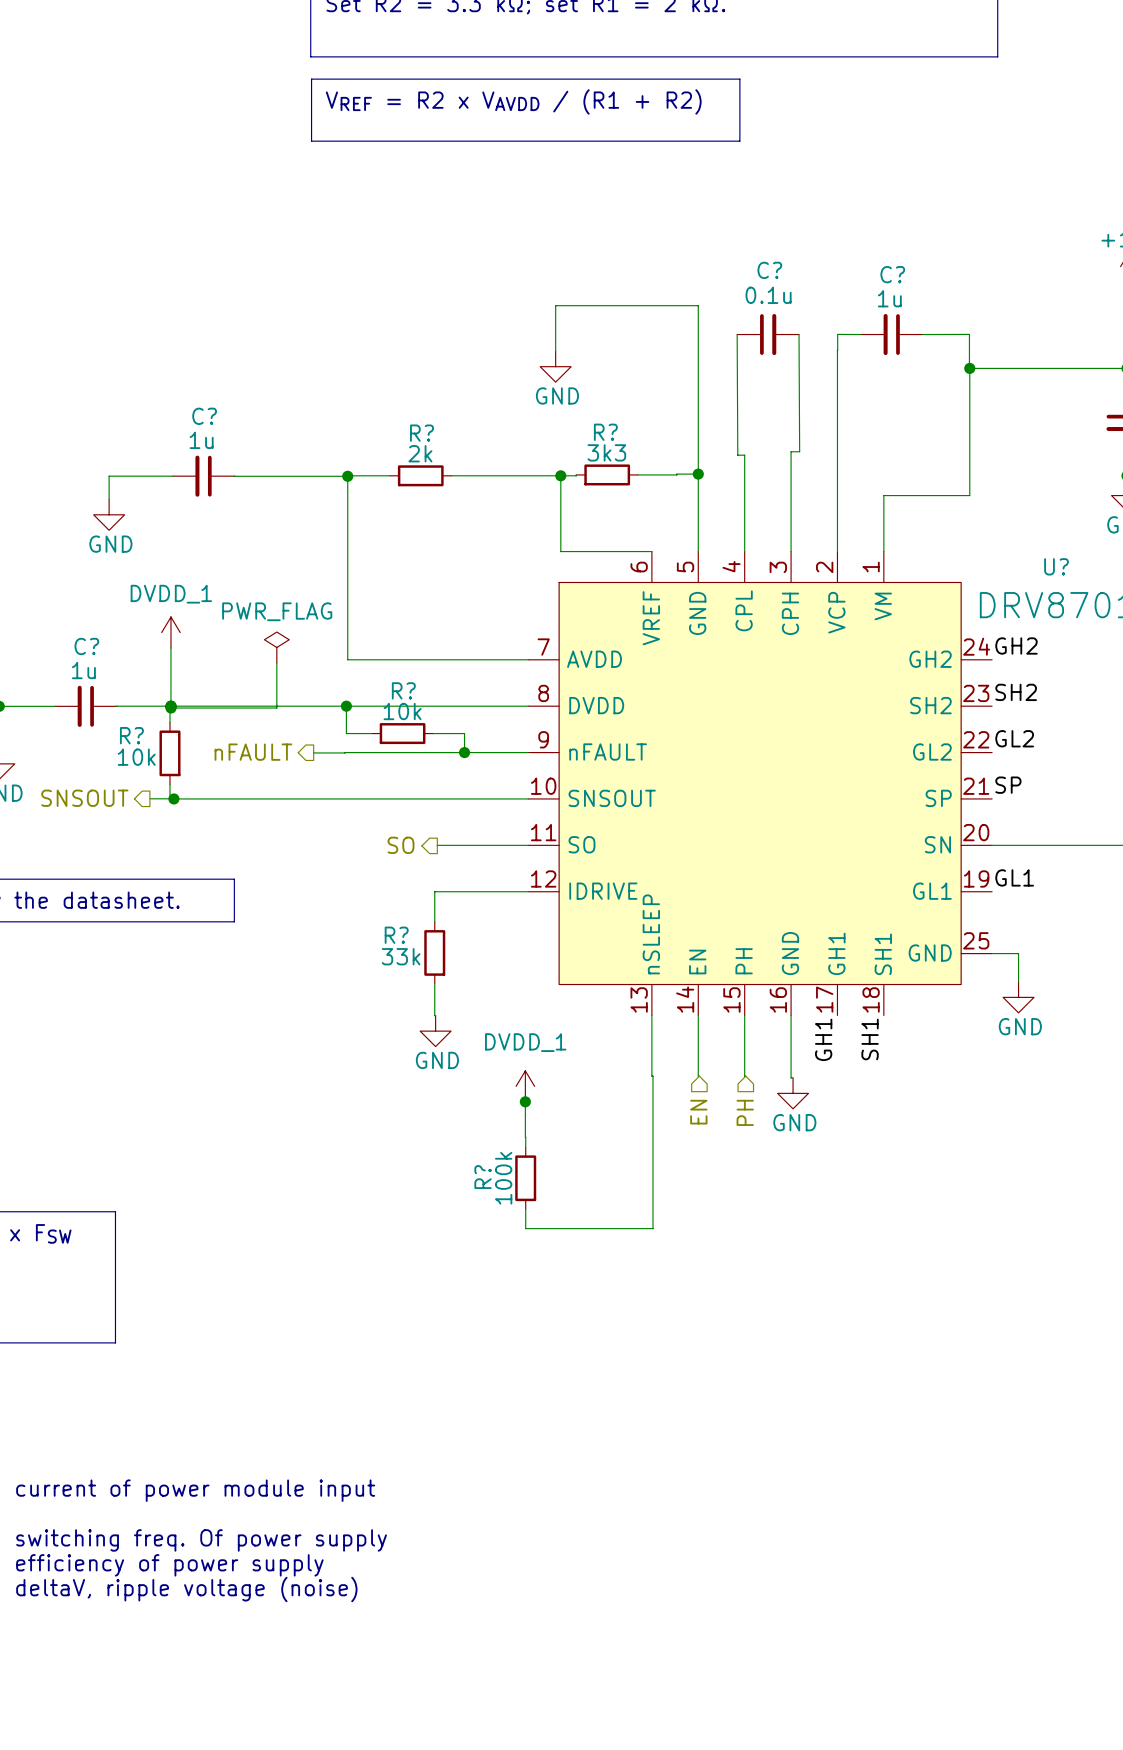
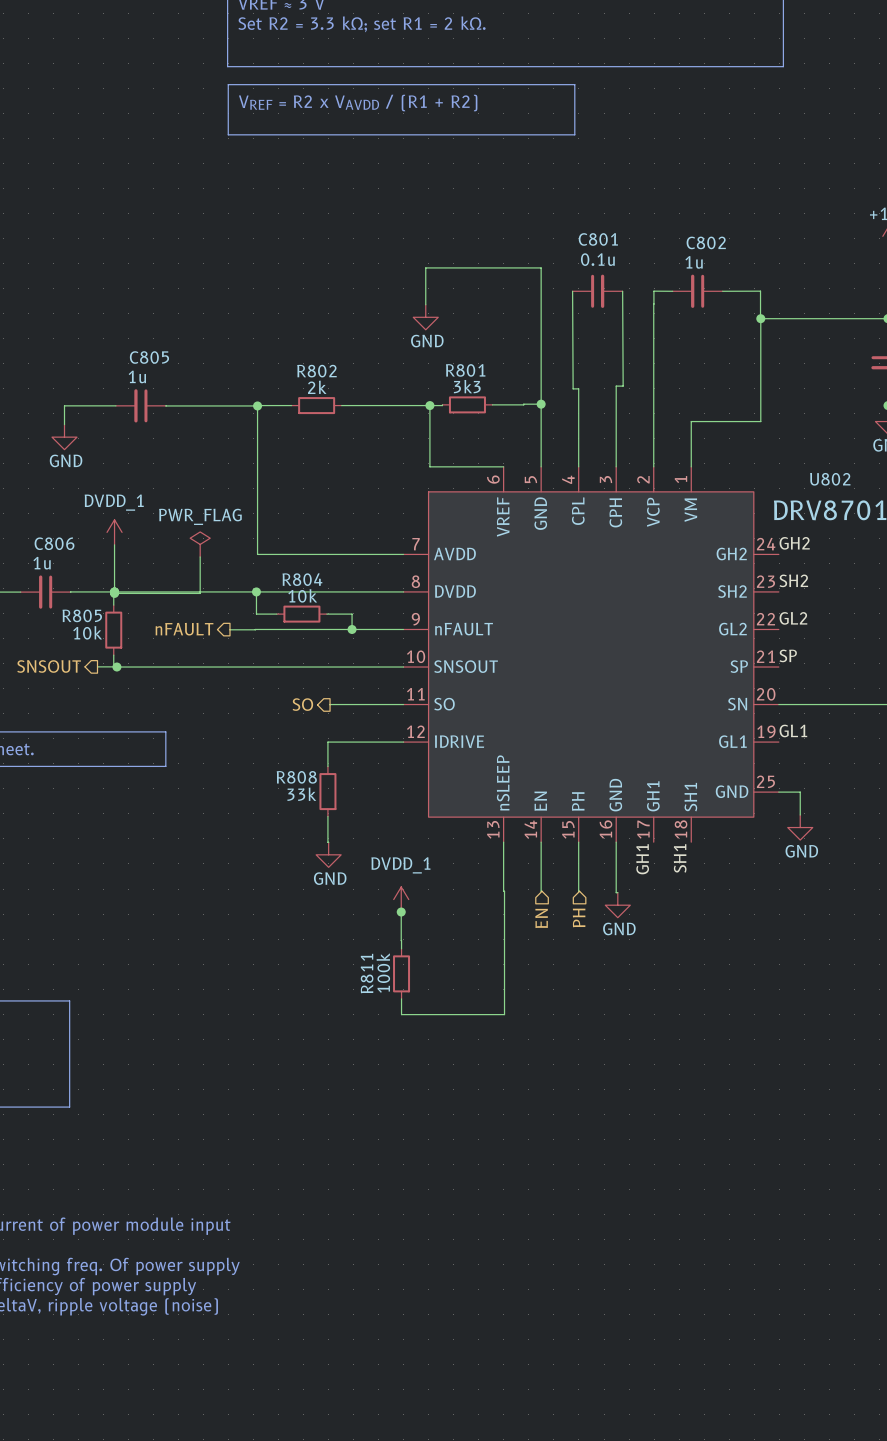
C? name: C? (769, 270) -> C801 (598, 239)
C? name: C? (892, 274) -> C802 (706, 242)
C? name: C? (204, 416) -> C805 (149, 357)
R? name: R? (605, 432) -> R801 (465, 370)
R? name: R? (421, 433) -> R802 (316, 371)
U? name: U? (1056, 566) -> U802 (830, 479)
C? name: C? (86, 646) -> C806 (54, 543)
R? name: R? (403, 690) -> R804 (302, 579)
R? name: R? (131, 735) -> R805 (82, 615)
R? name: R? (396, 935) -> R808 (296, 777)
R? name: R? (483, 1177) -> R811 (367, 973)

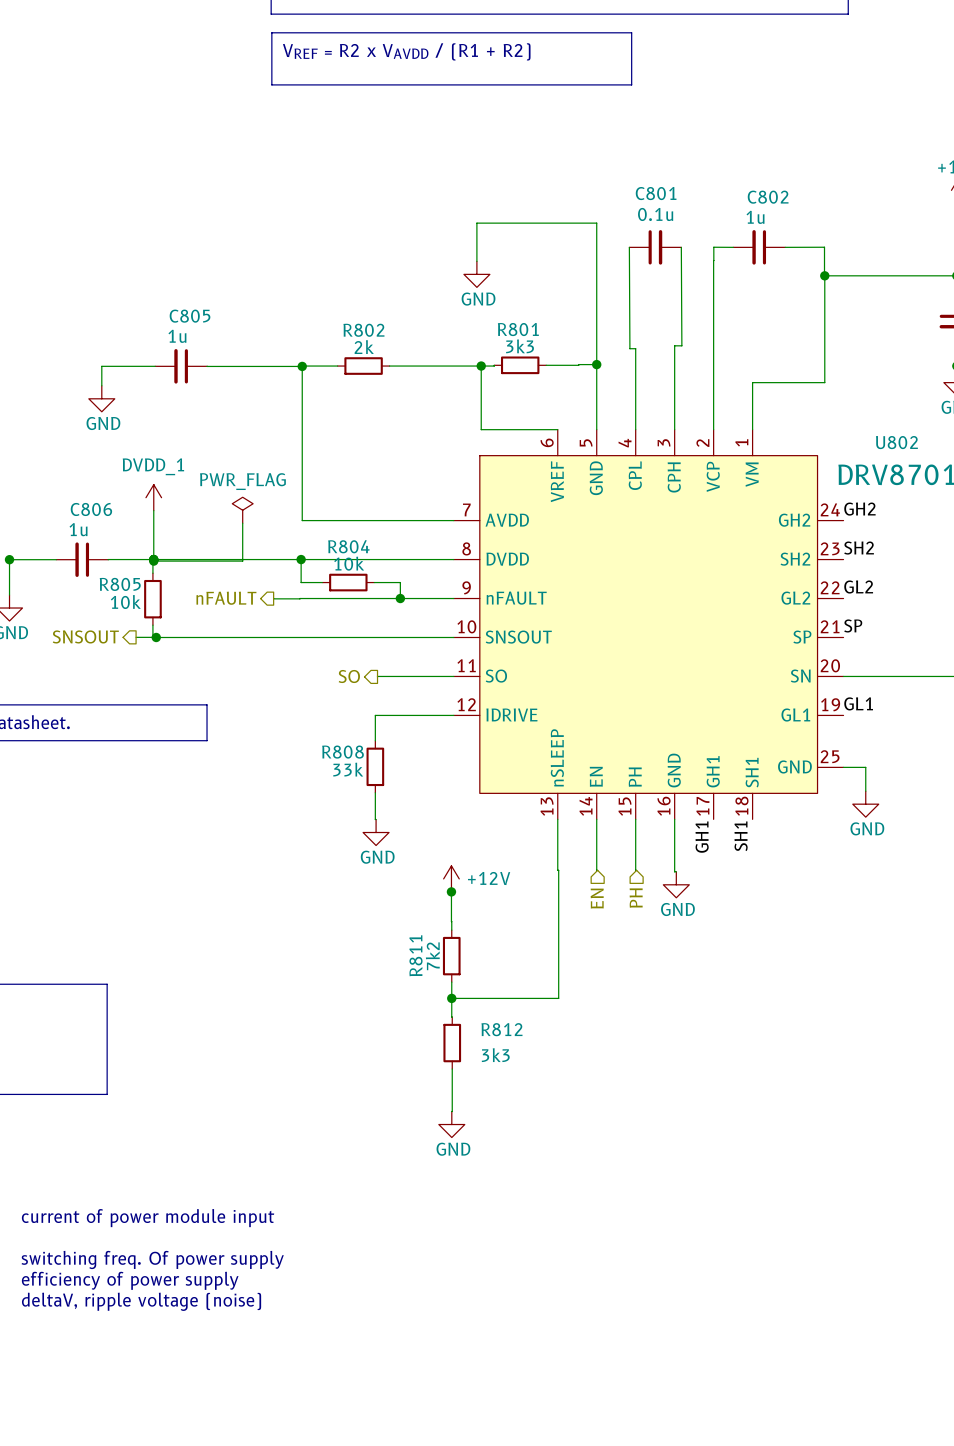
power symbol: DVDD_1 (401, 899) -> +12V (451, 878)
R811 value: 100k (383, 973) -> 7k2 (432, 956)
wire: none -> (451, 998) (452, 1017)
junction: none -> (451, 998)
R812: none -> 3k3 (452, 1043)
wire: none -> (452, 1069) (451, 1111)
power symbol: none -> GND (451, 1124)

